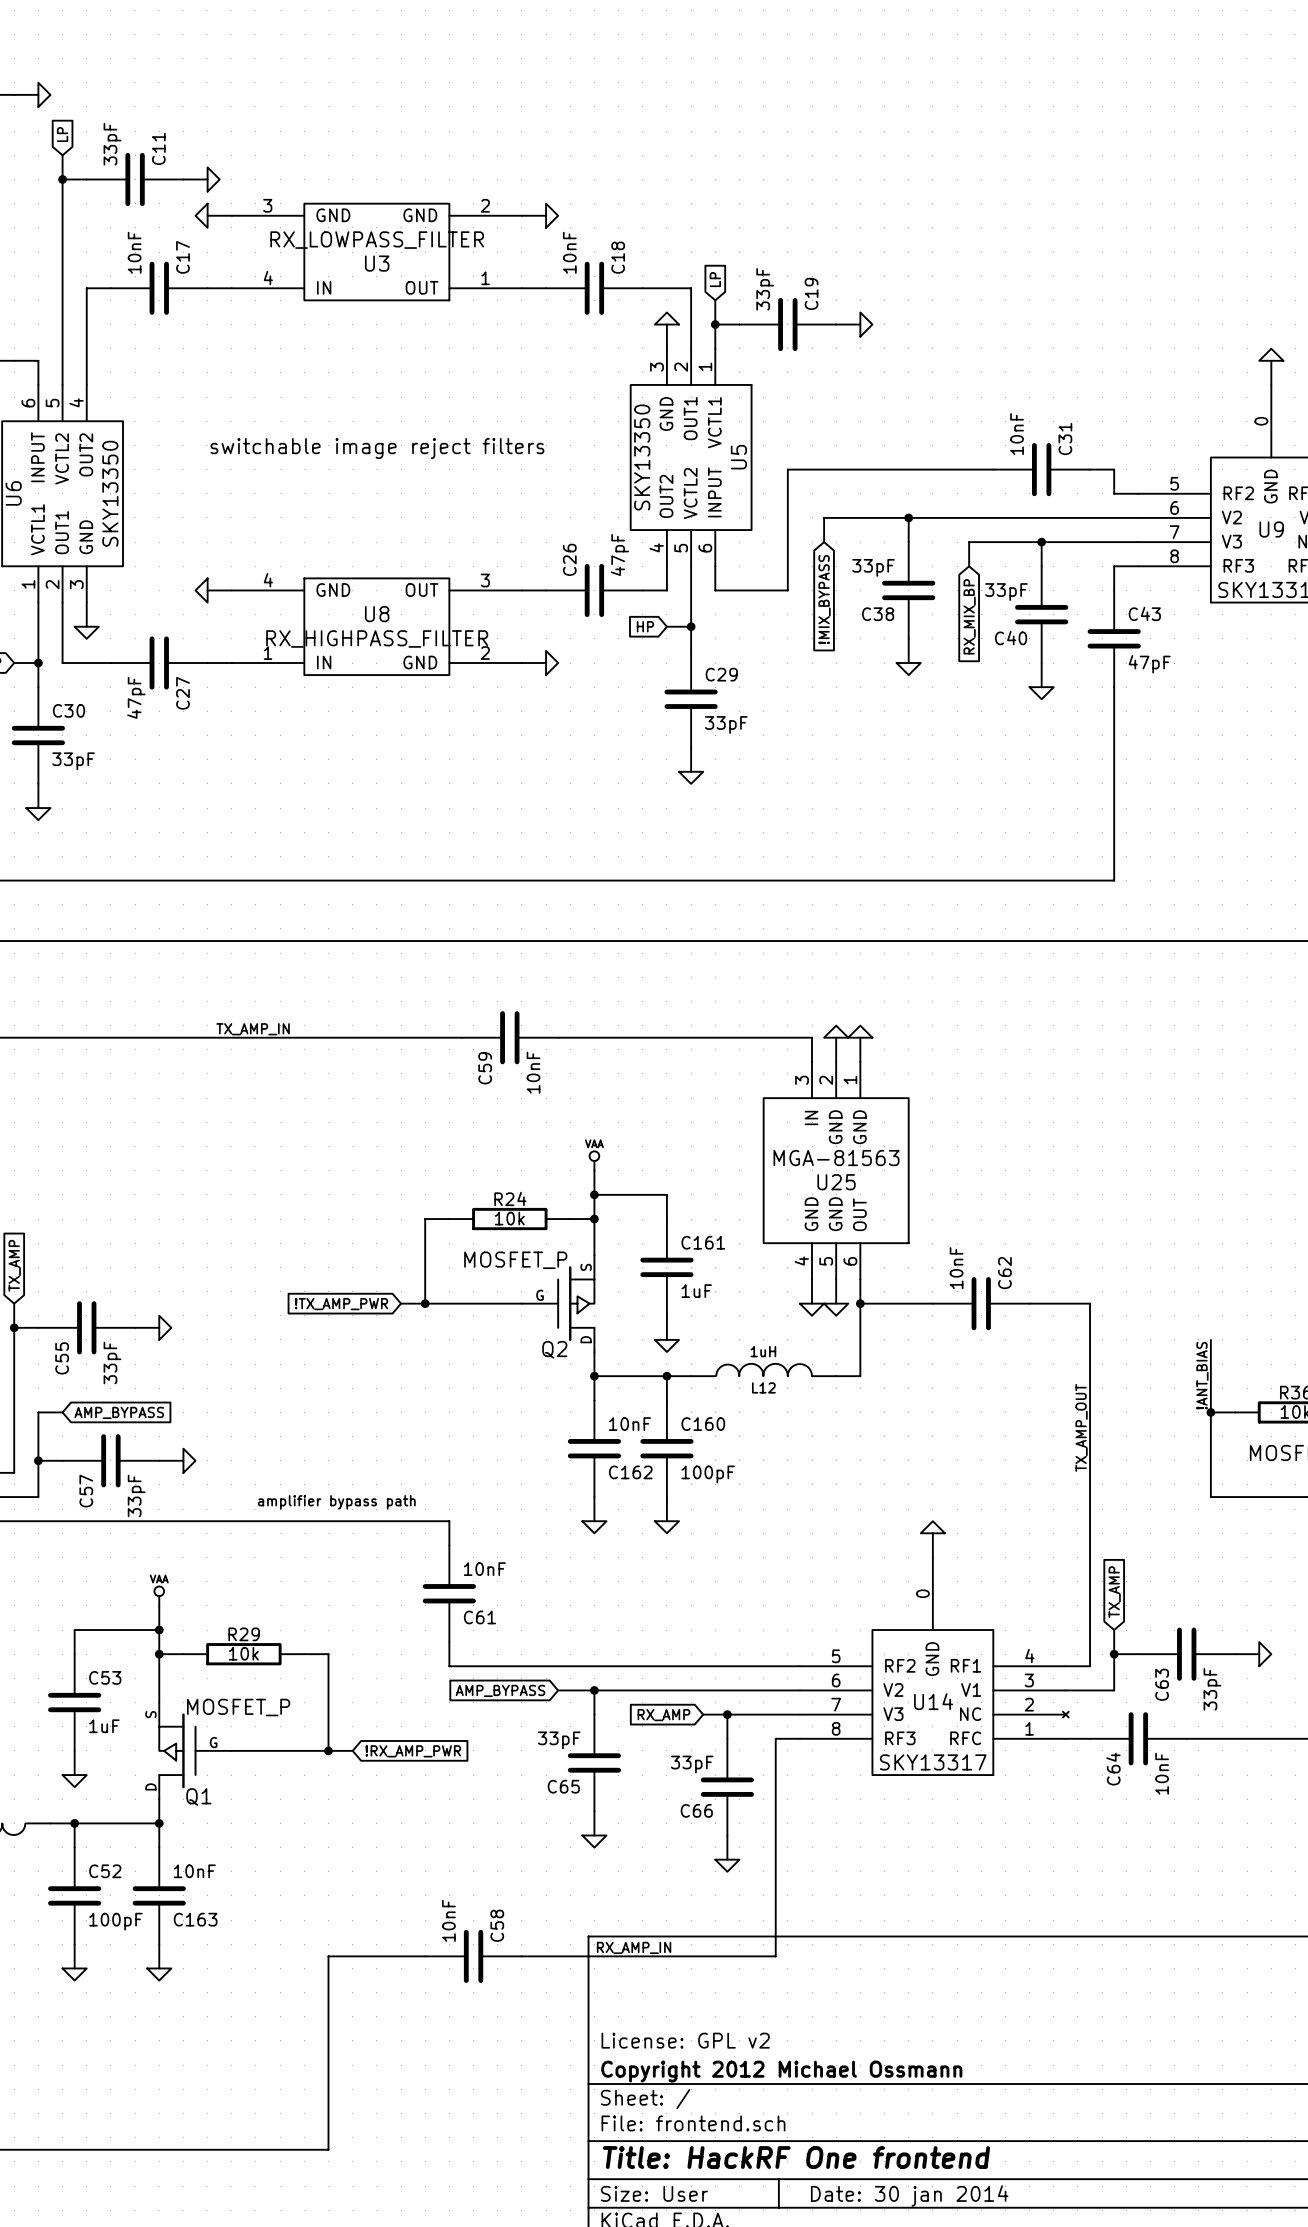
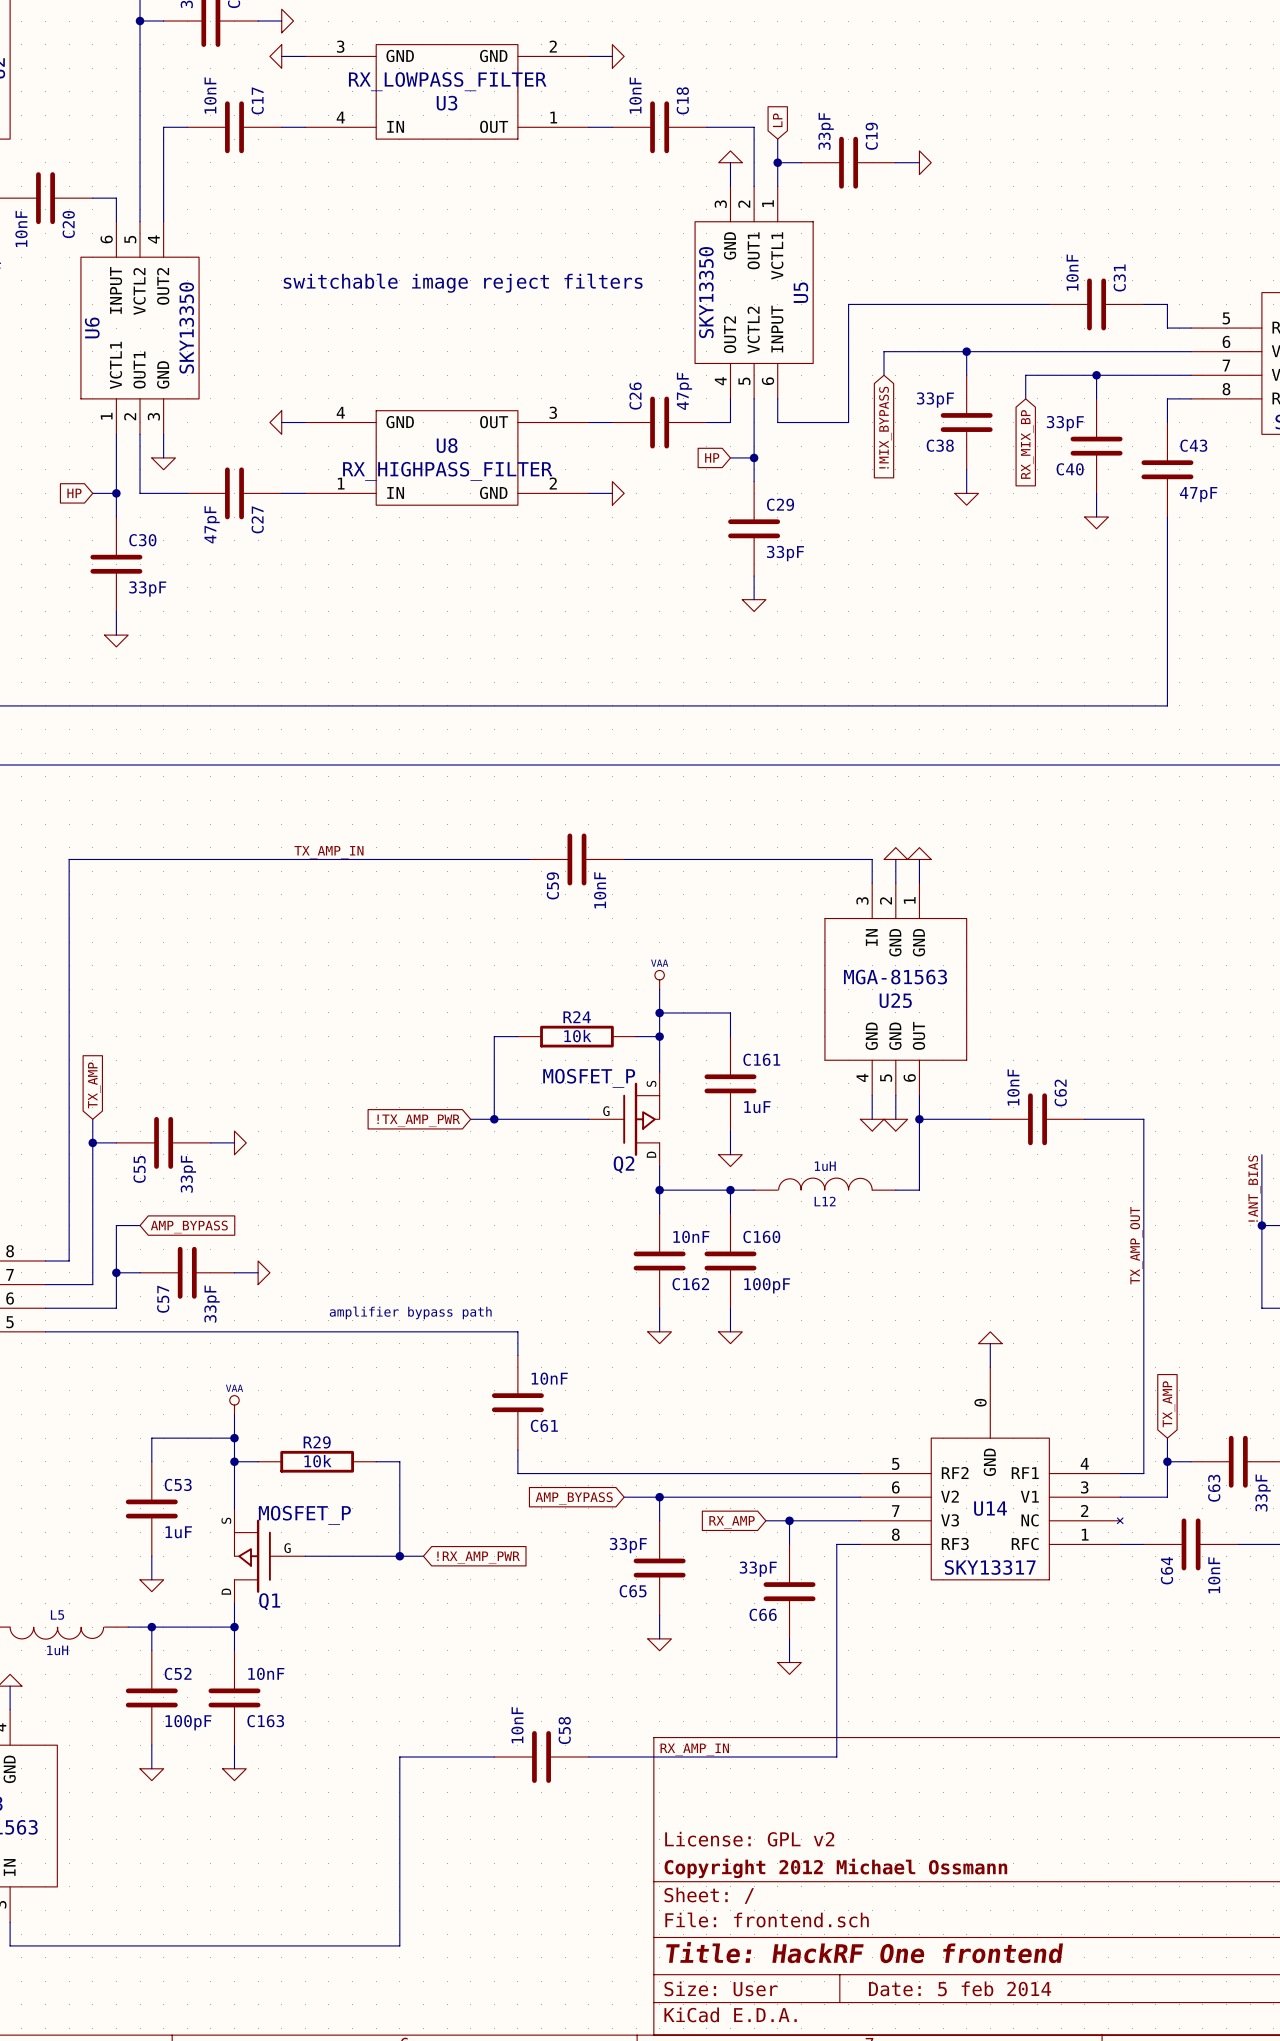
title block: Date: 30 jan 2014 (909, 2195) -> Date: 5 feb 2014 (960, 1988)

